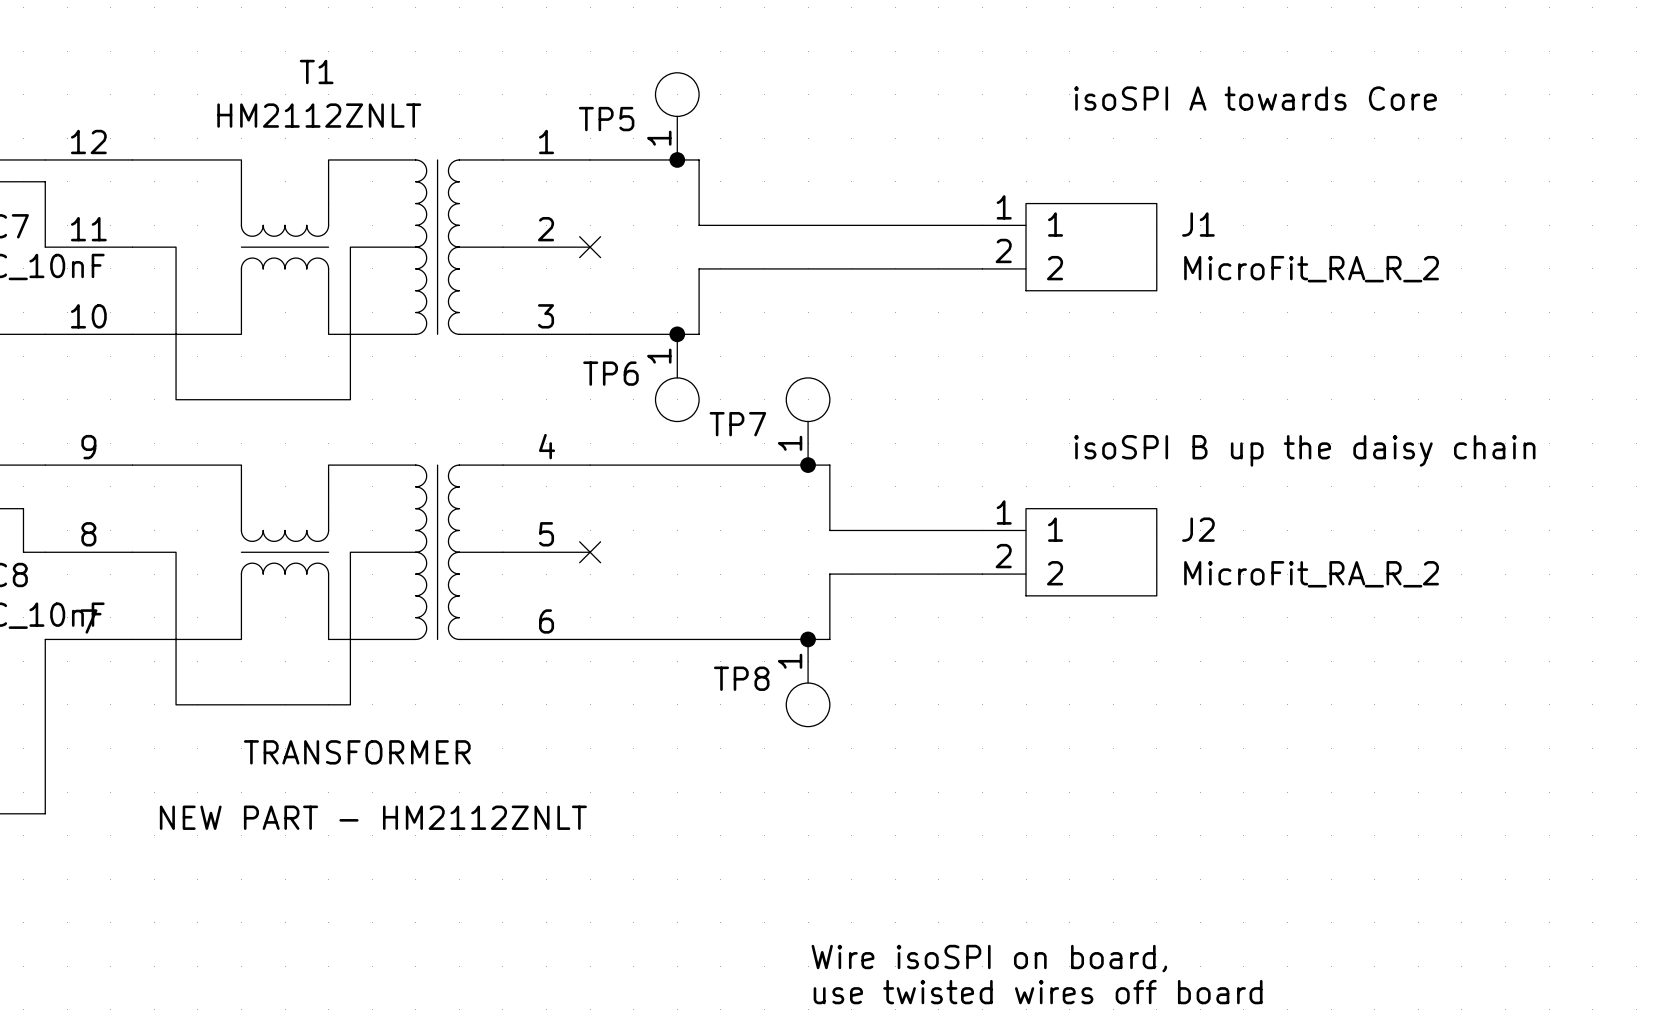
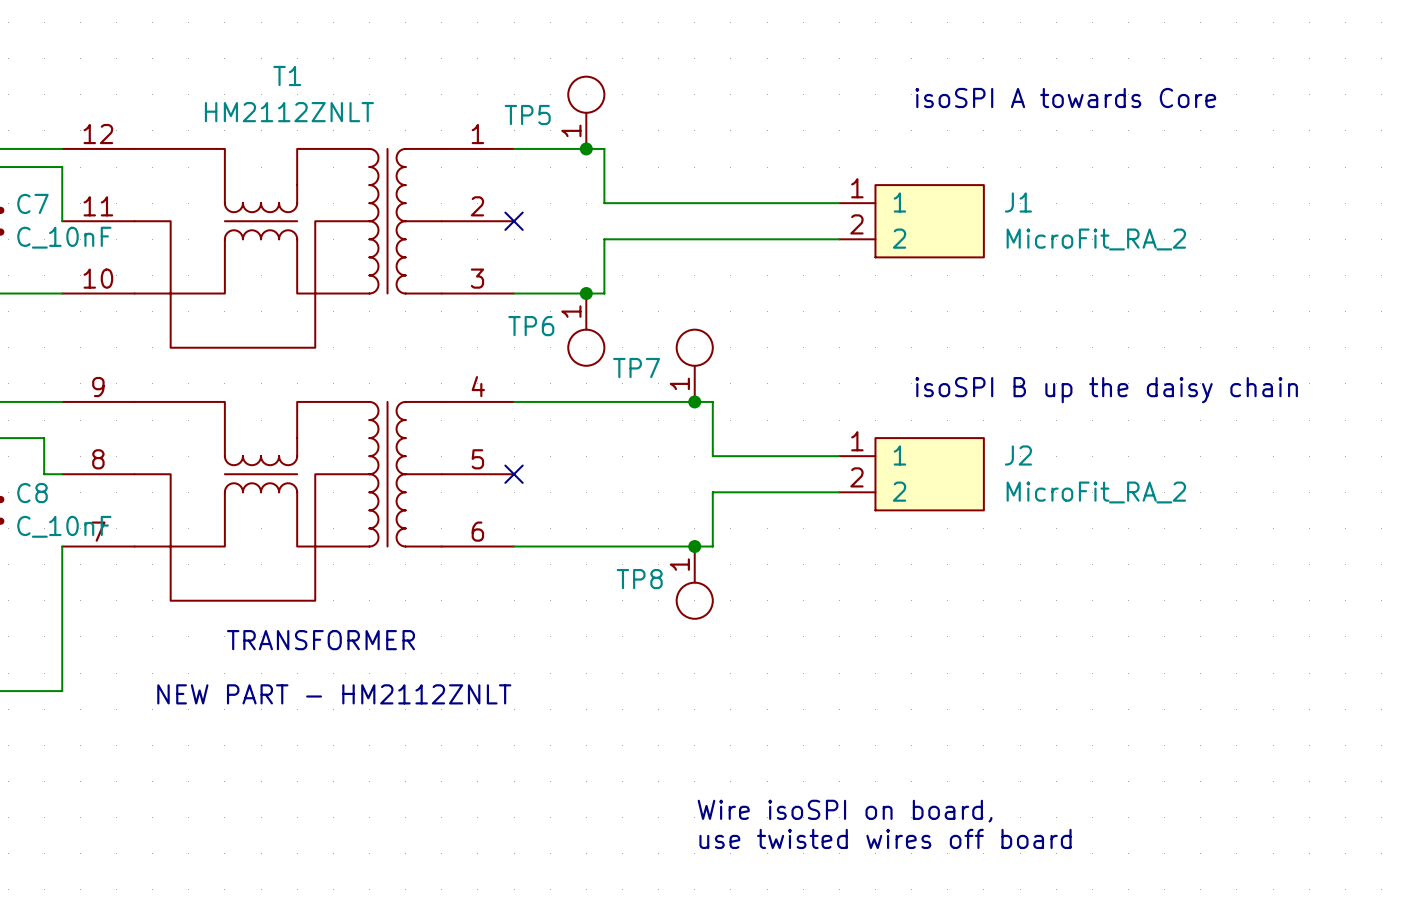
J1 value: MicroFit_RA_R_2 (1311, 269) -> MicroFit_RA_2 (1096, 239)
J2 value: MicroFit_RA_R_2 (1311, 574) -> MicroFit_RA_2 (1096, 492)

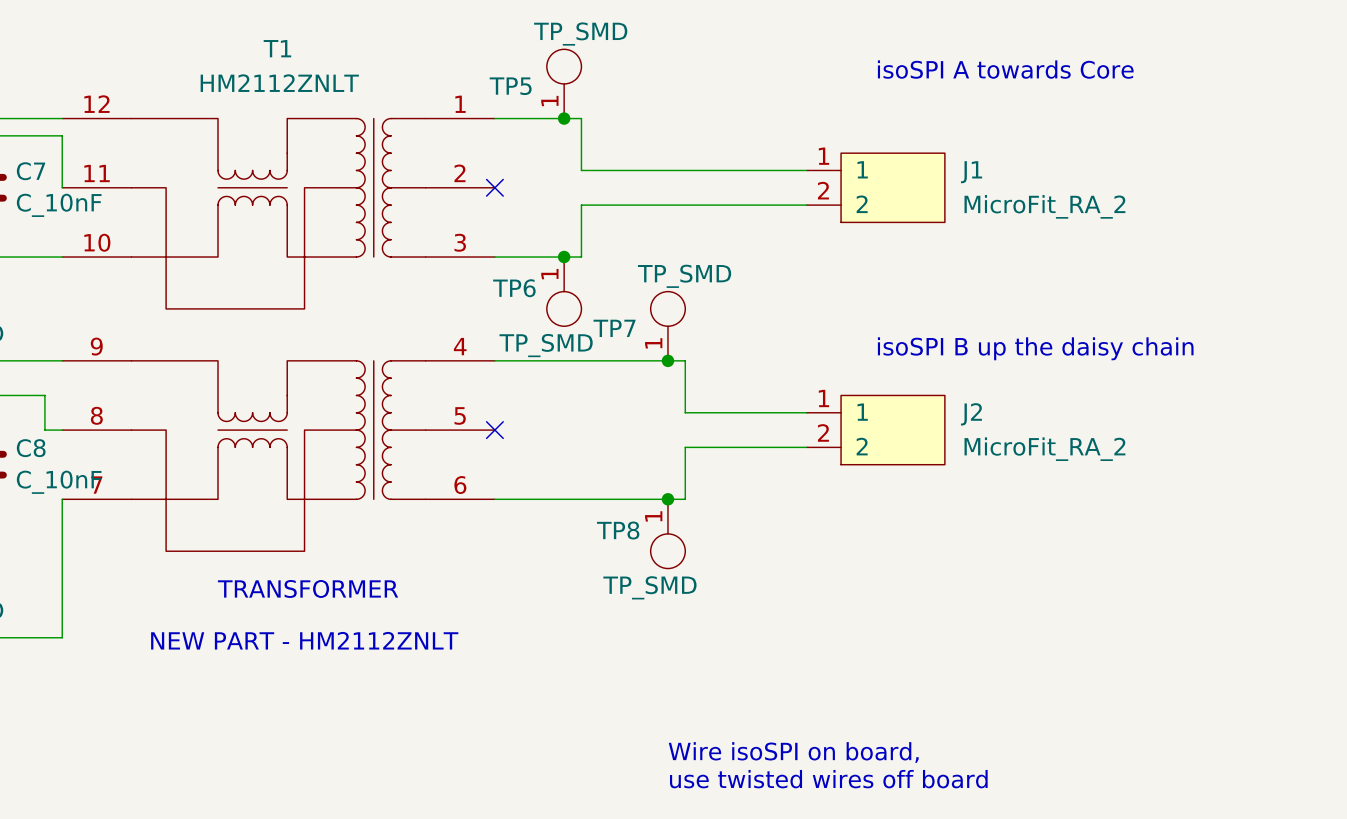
TP5 value: none -> TP_SMD (580, 34)
TP7 value: none -> TP_SMD (684, 276)
TP6 value: none -> TP_SMD (546, 345)
TP8 value: none -> TP_SMD (649, 587)

